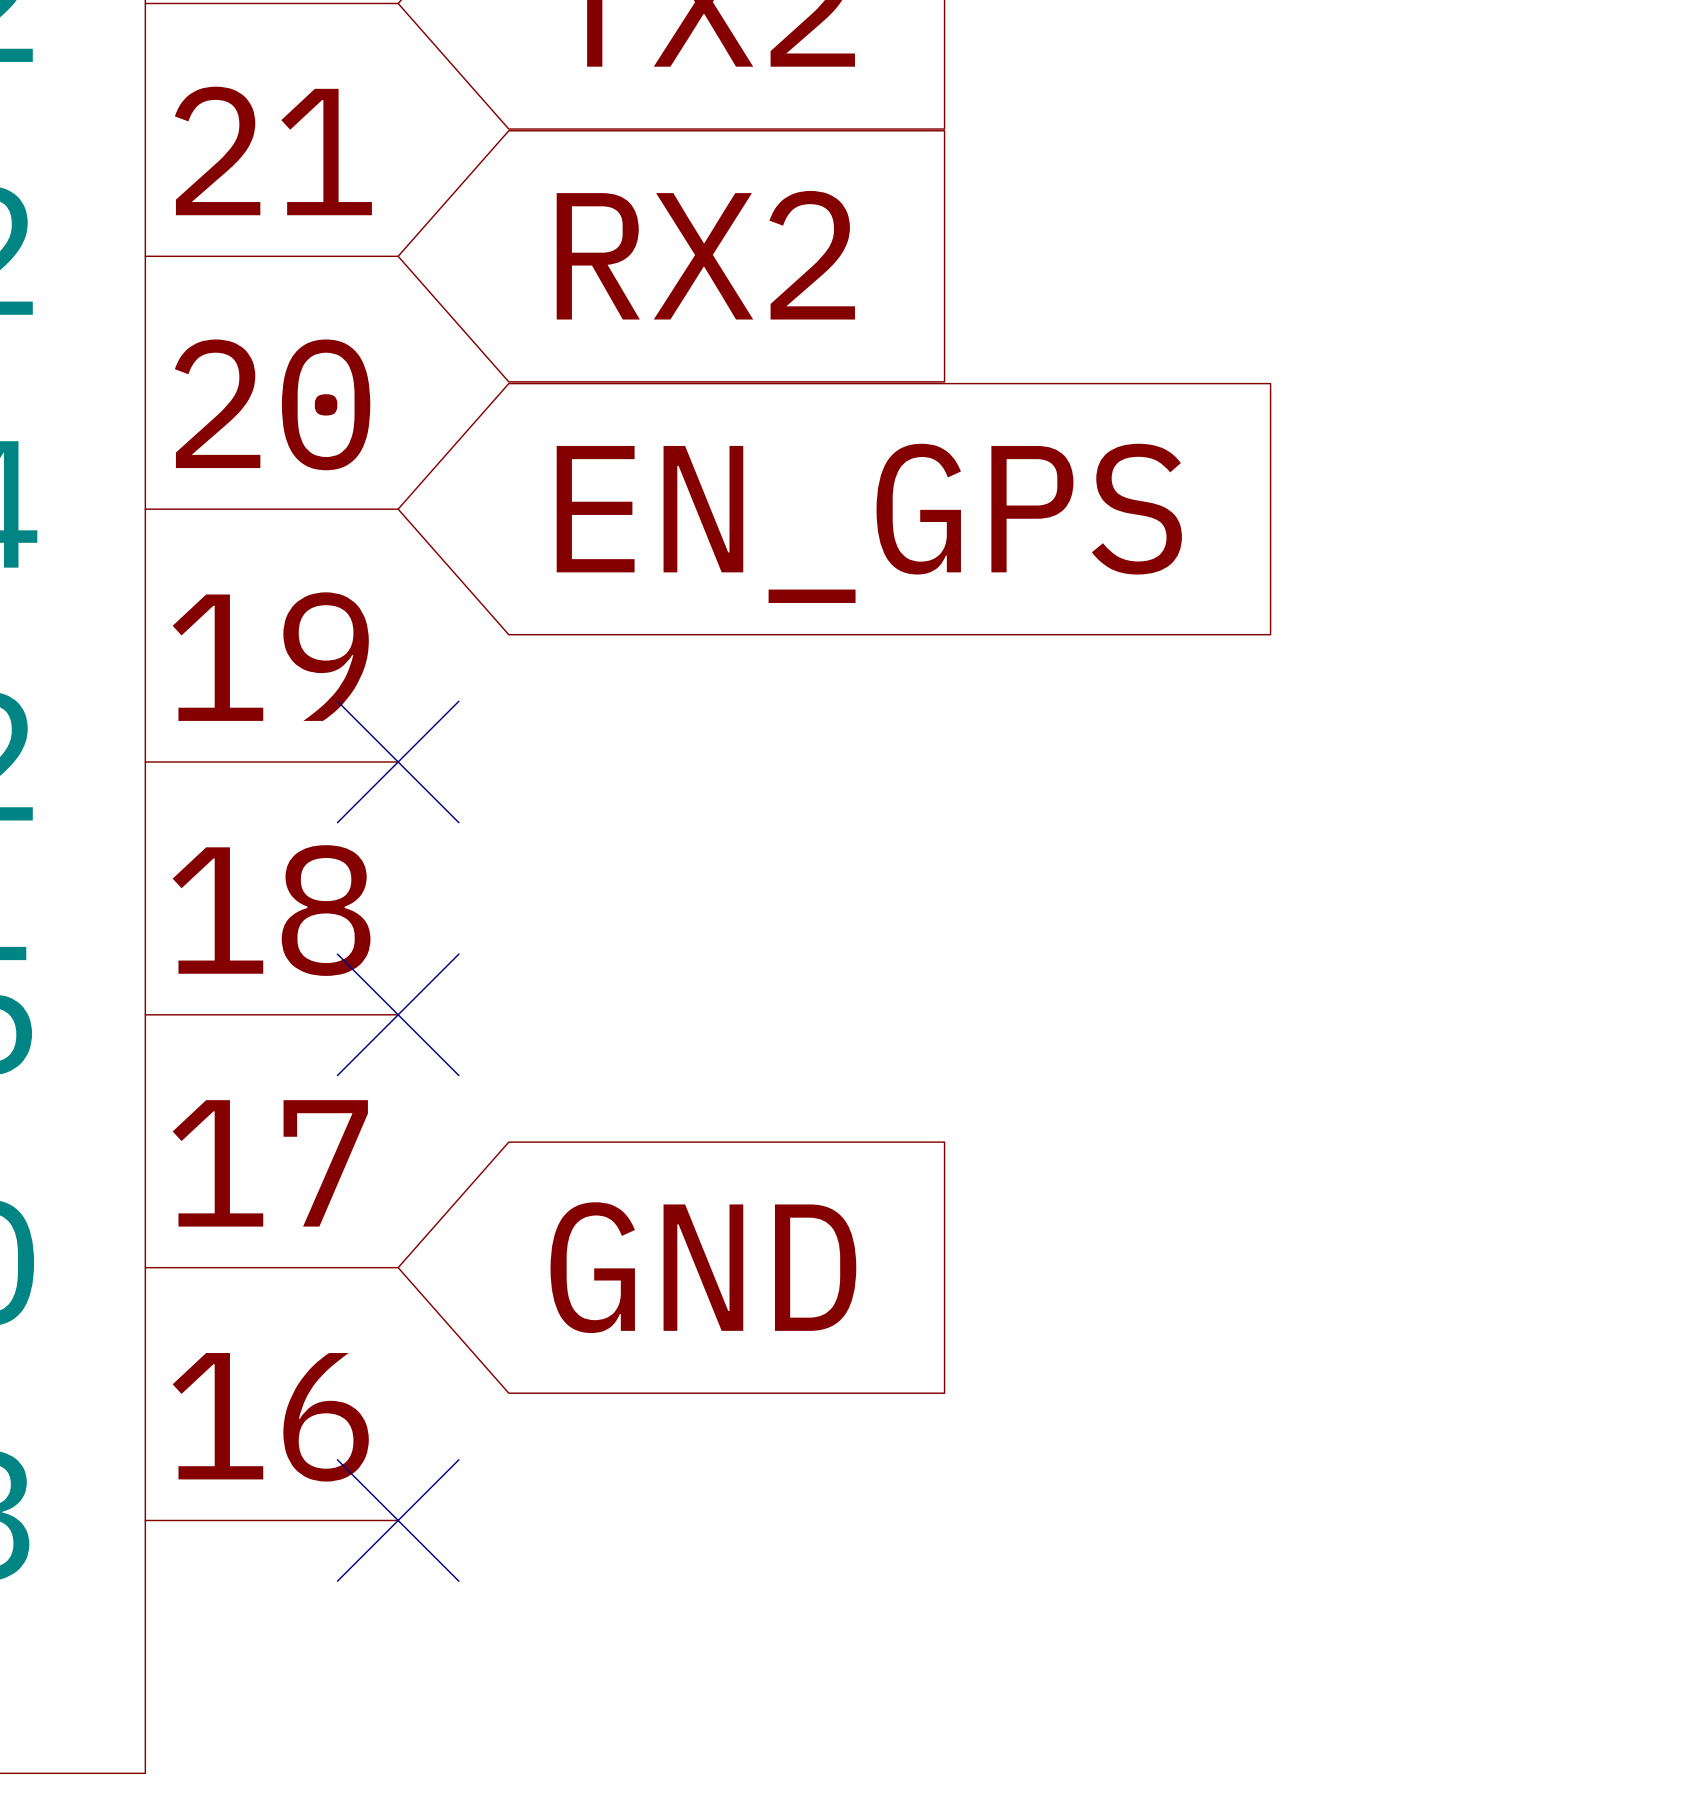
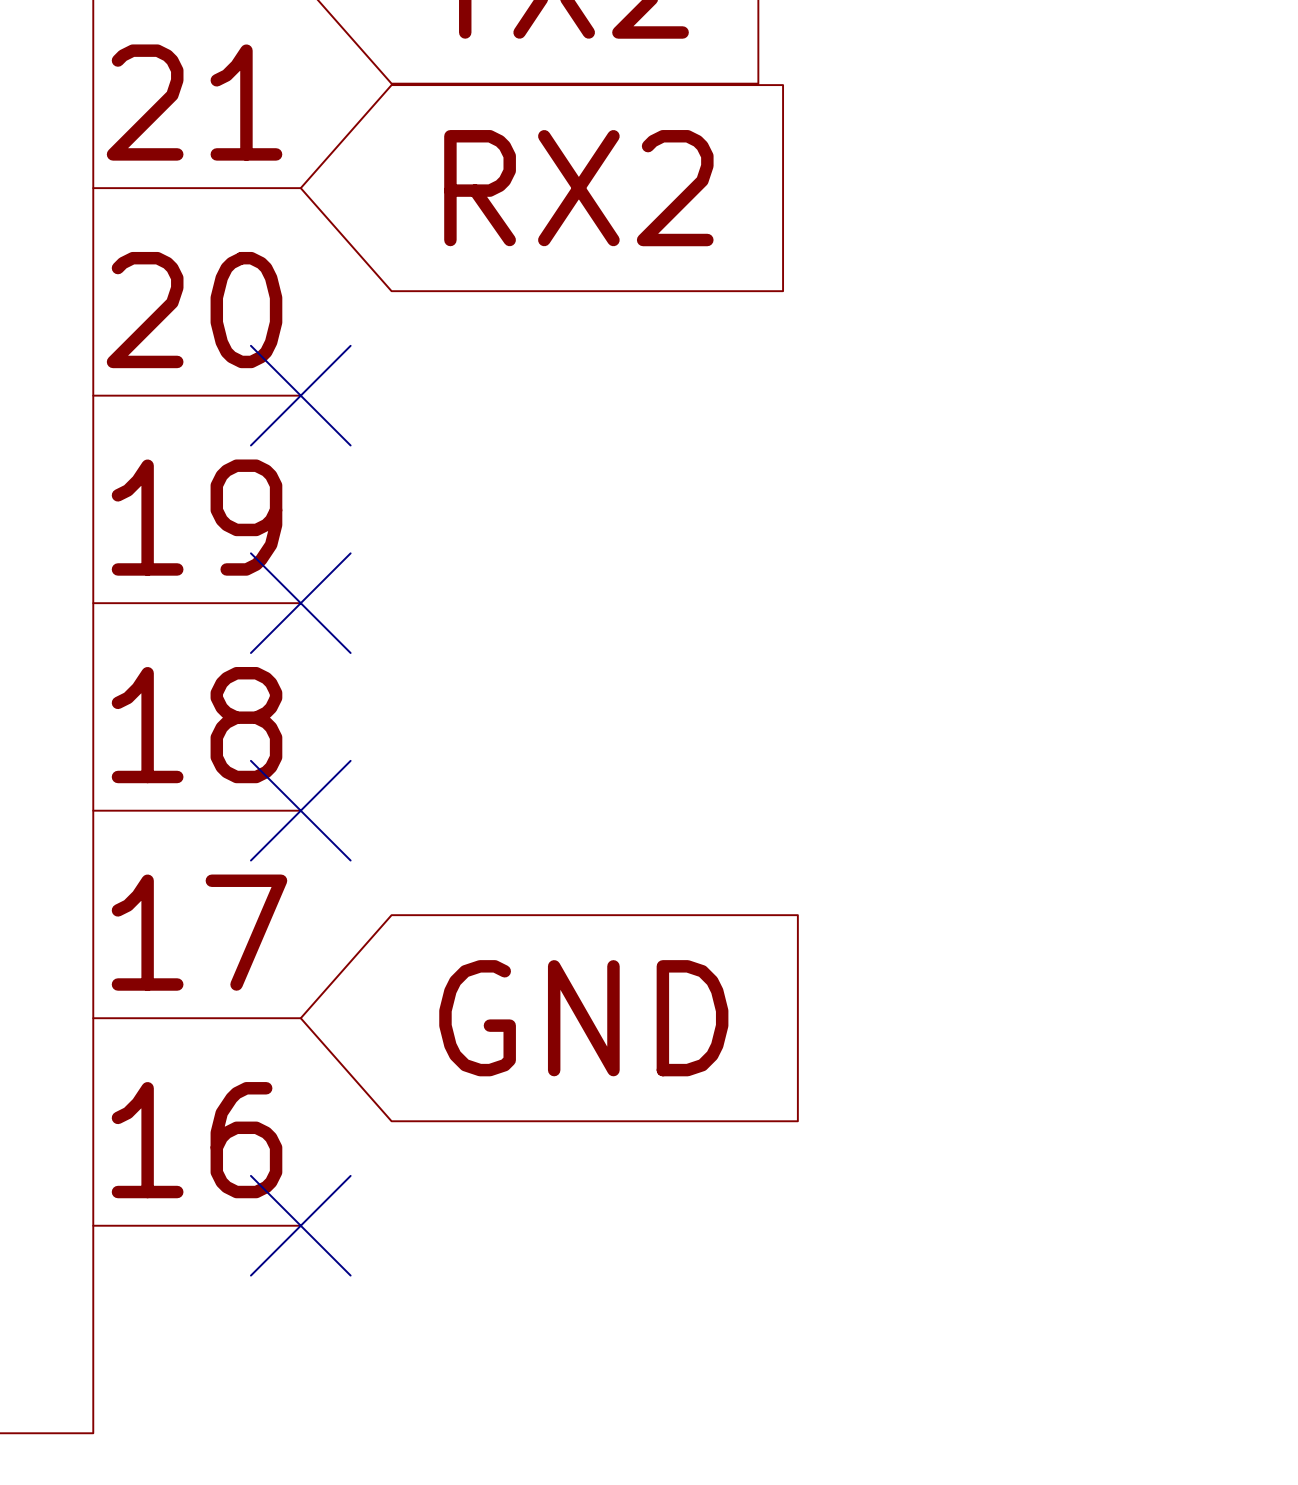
no-connect mark: none -> (300, 395)
global label: EN_GPS (869, 523) -> none

